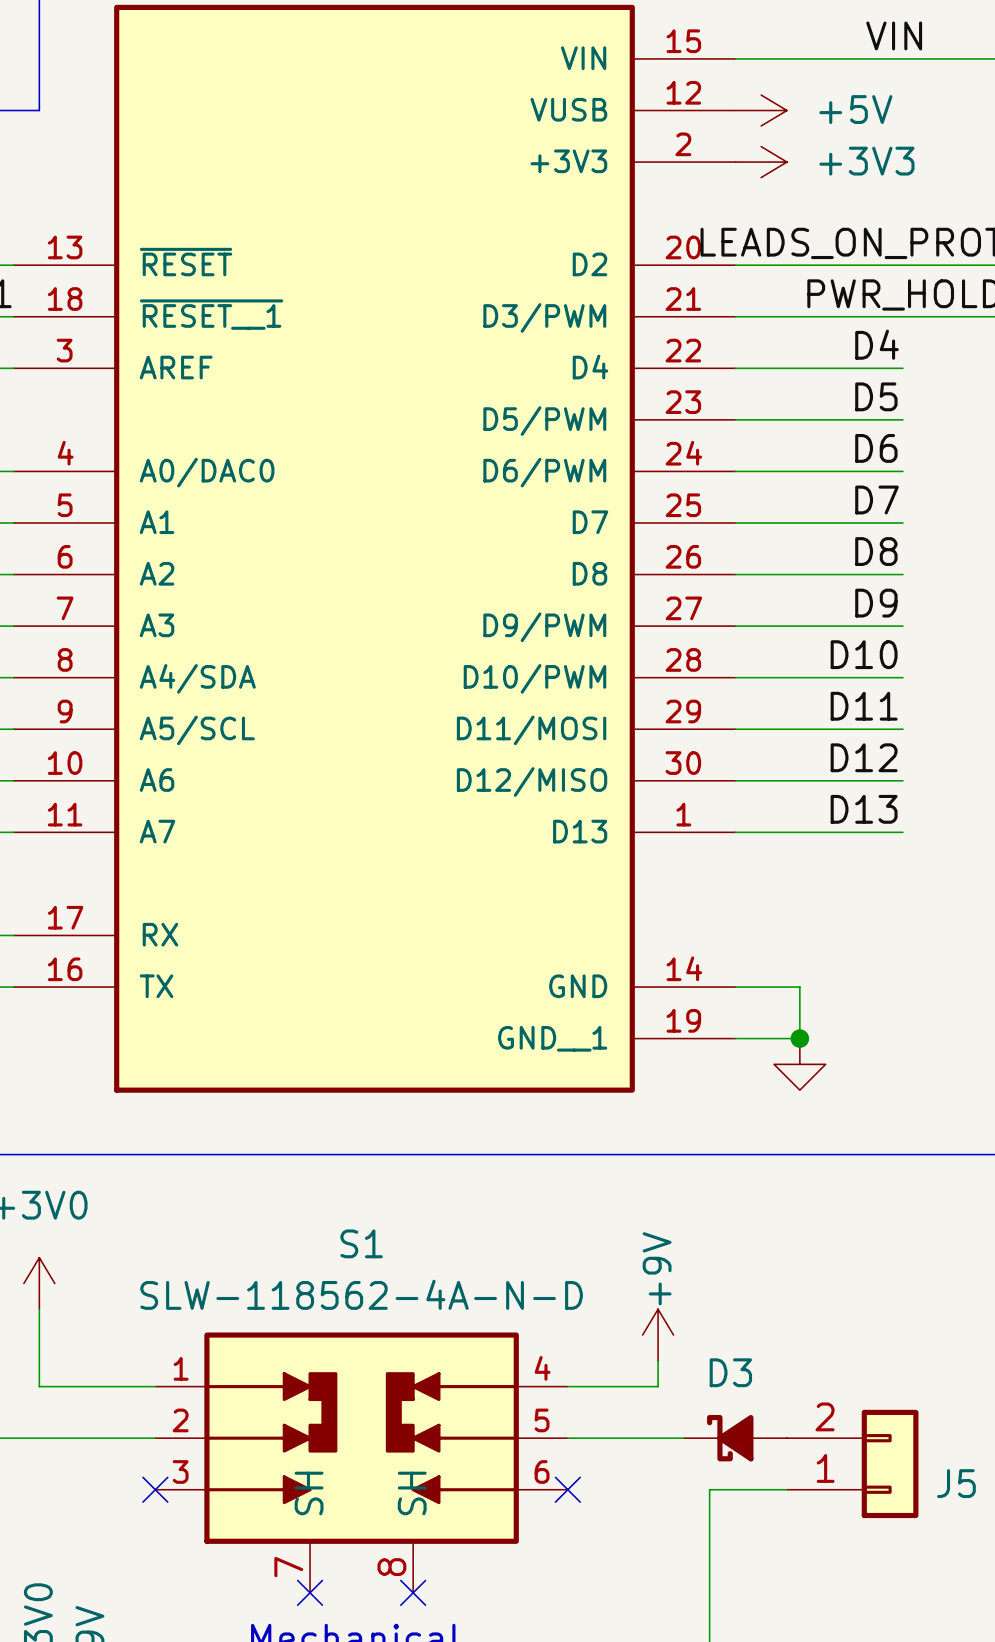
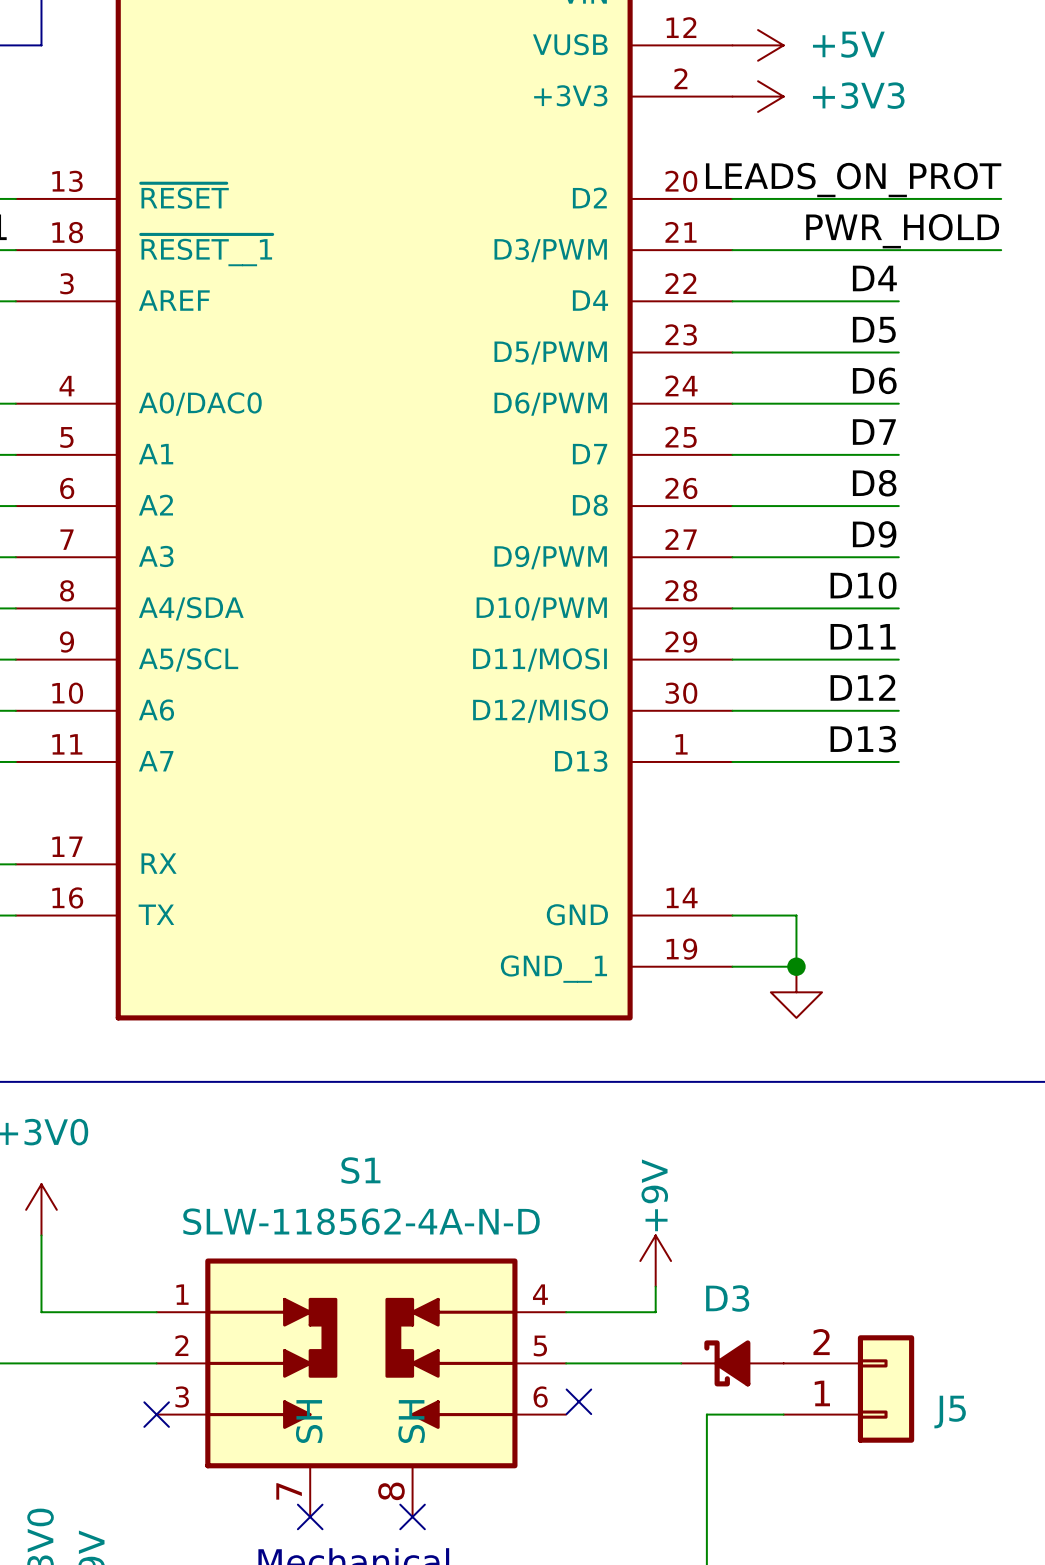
no-connect mark position: (567, 1489) -> (578, 1401)

